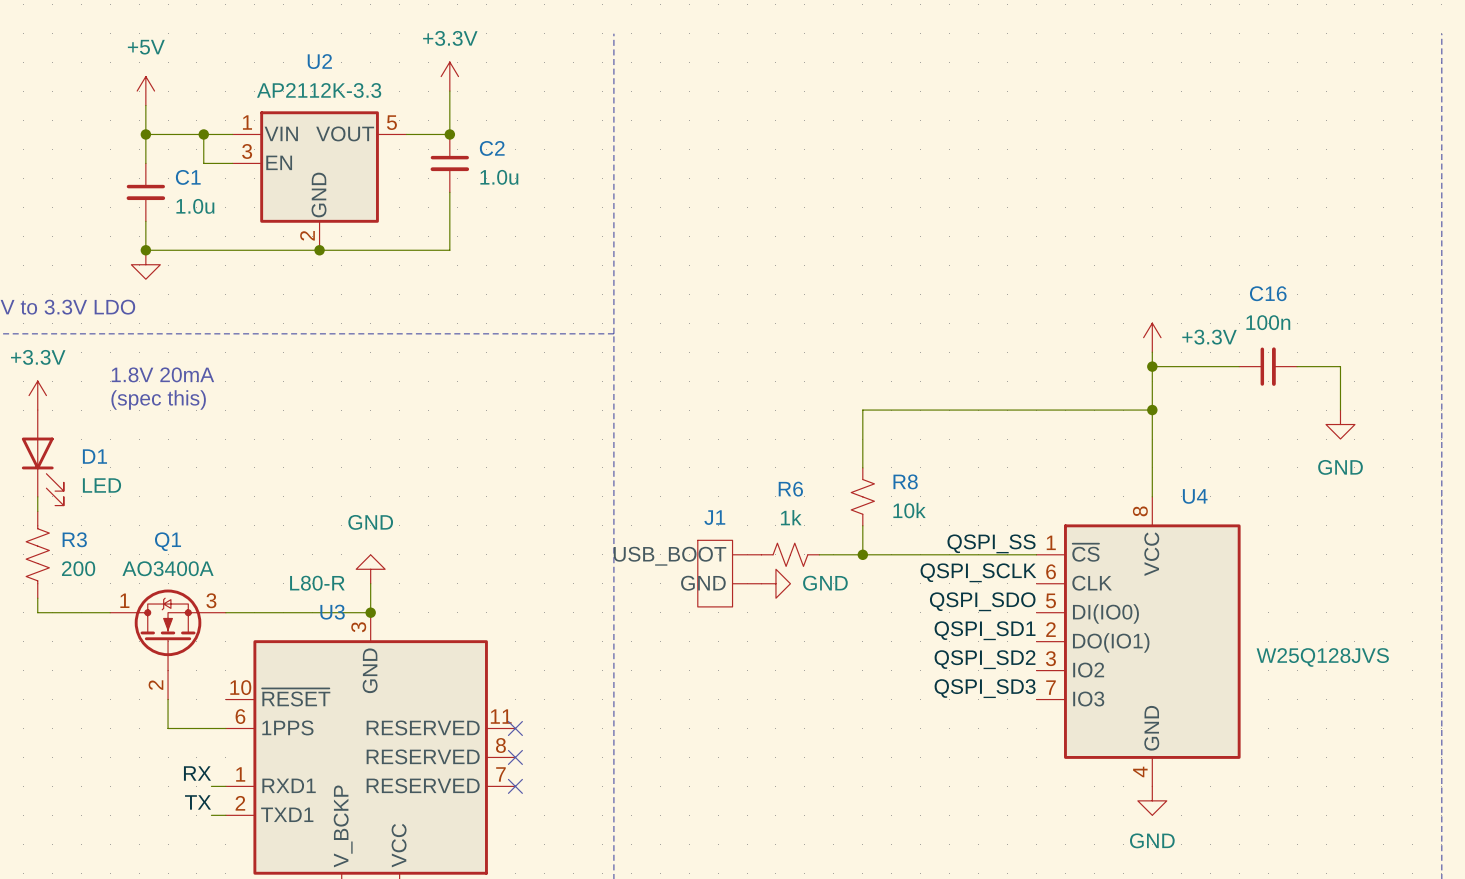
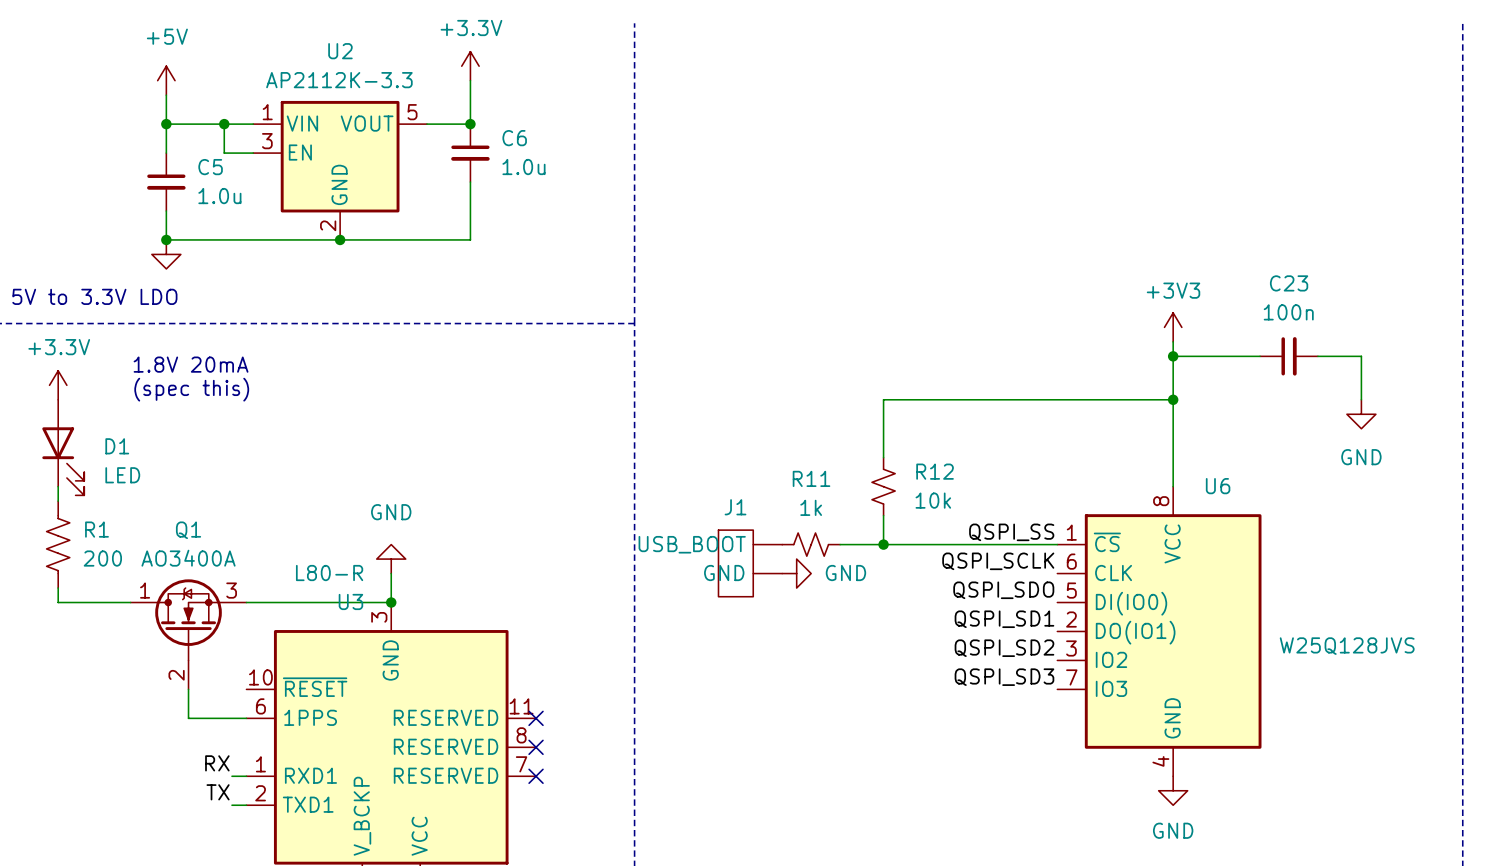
C2 name: C2 (492, 148) -> C6 (514, 138)
C1 name: C1 (188, 177) -> C5 (210, 167)
C16 name: C16 (1268, 293) -> C23 (1289, 283)
power symbol: +3.3V (1152, 337) -> +3V3 (1173, 327)
R8 name: R8 (905, 481) -> R12 (935, 471)
R6 name: R6 (790, 489) -> R11 (811, 478)
U4 name: U4 (1195, 496) -> U6 (1218, 486)
R3 name: R3 (74, 539) -> R1 (96, 529)

